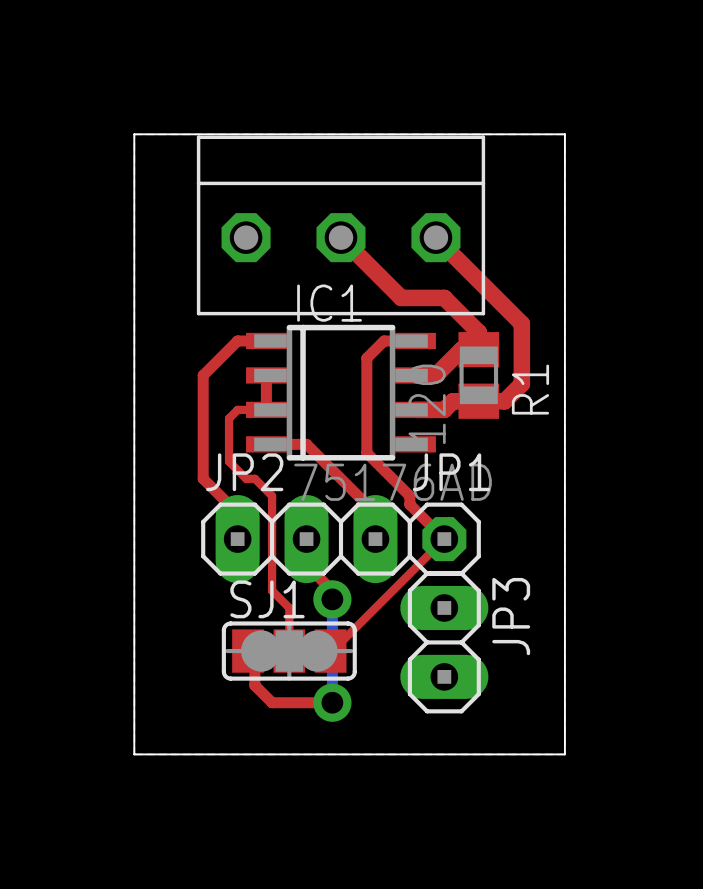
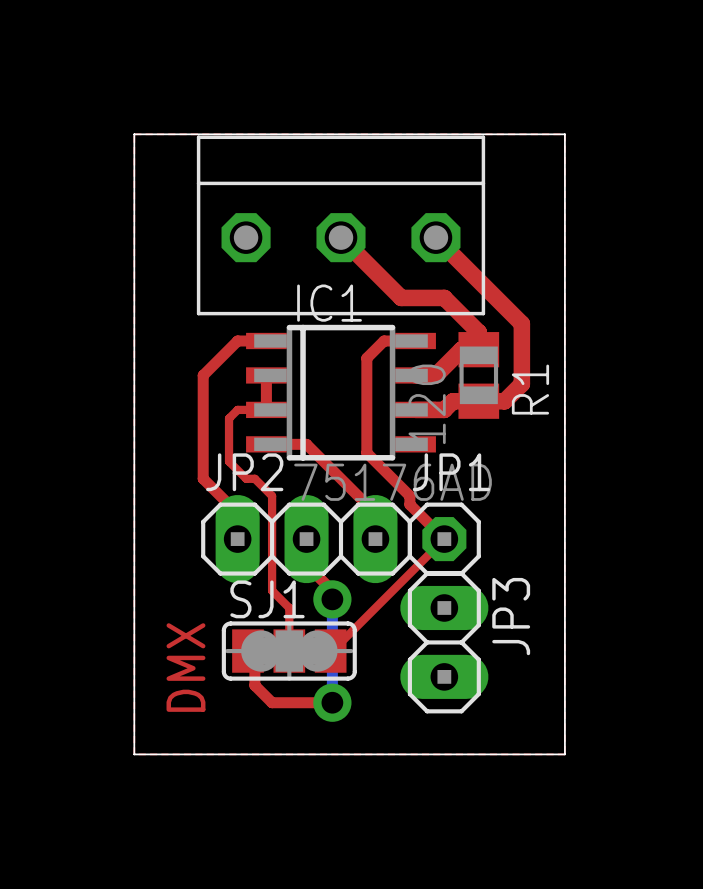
text: none -> DMX (185, 667)

